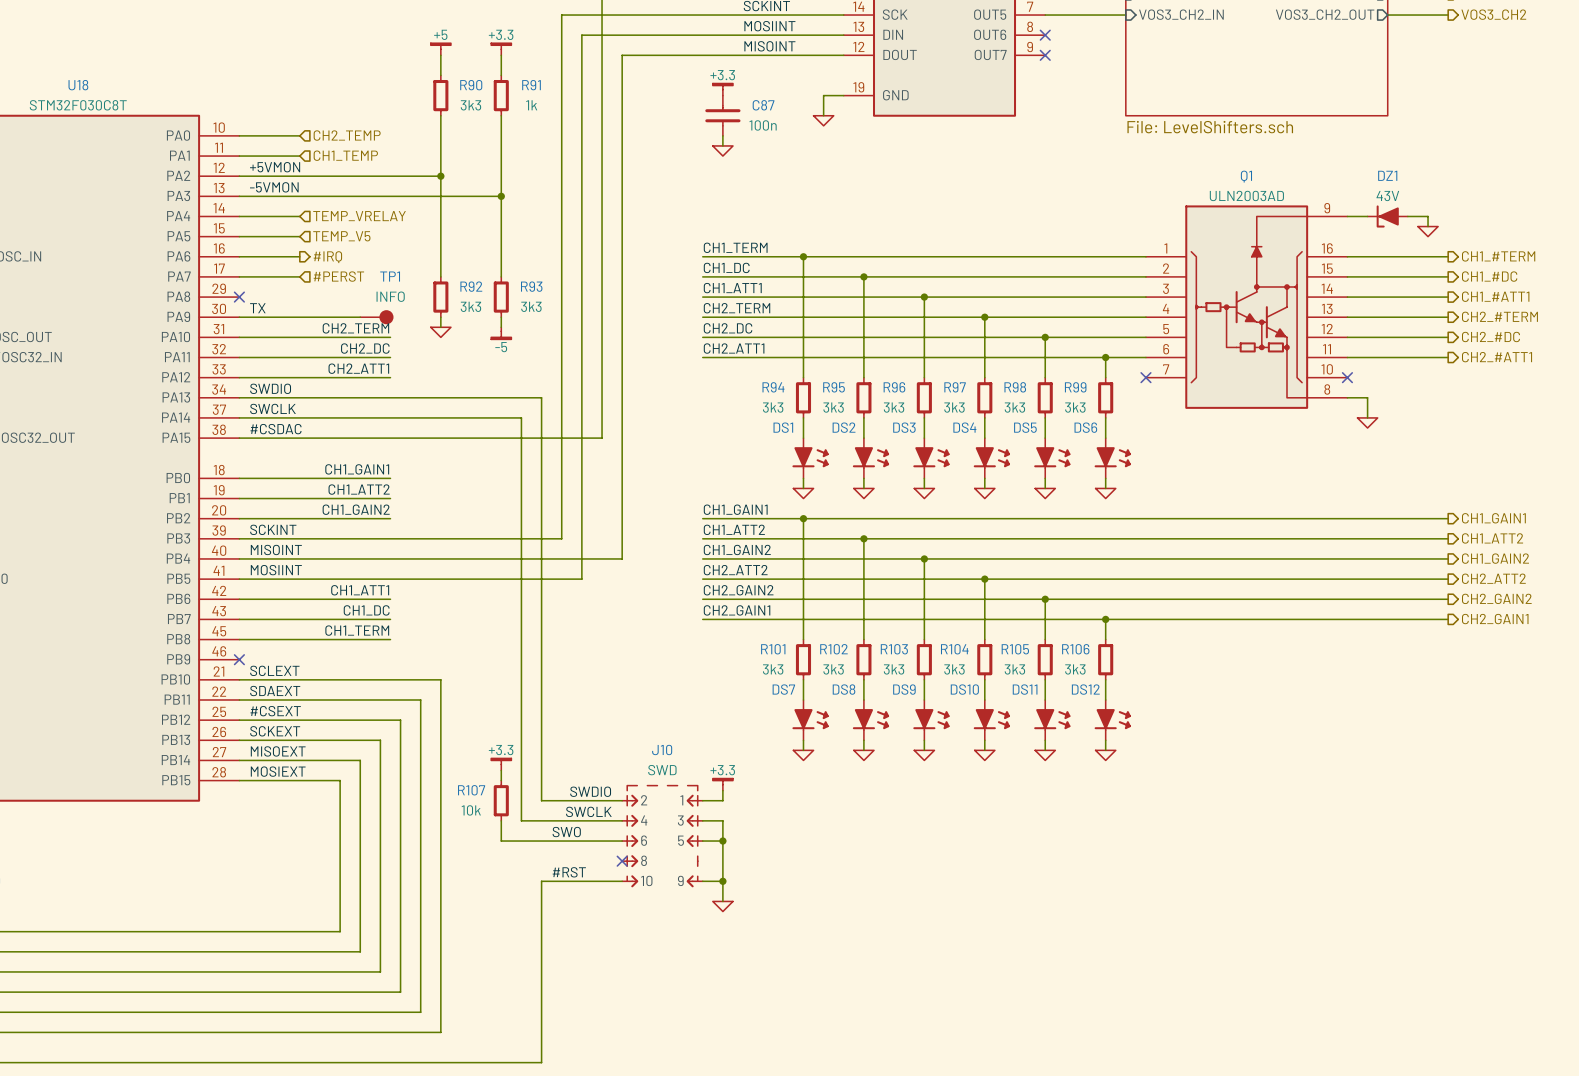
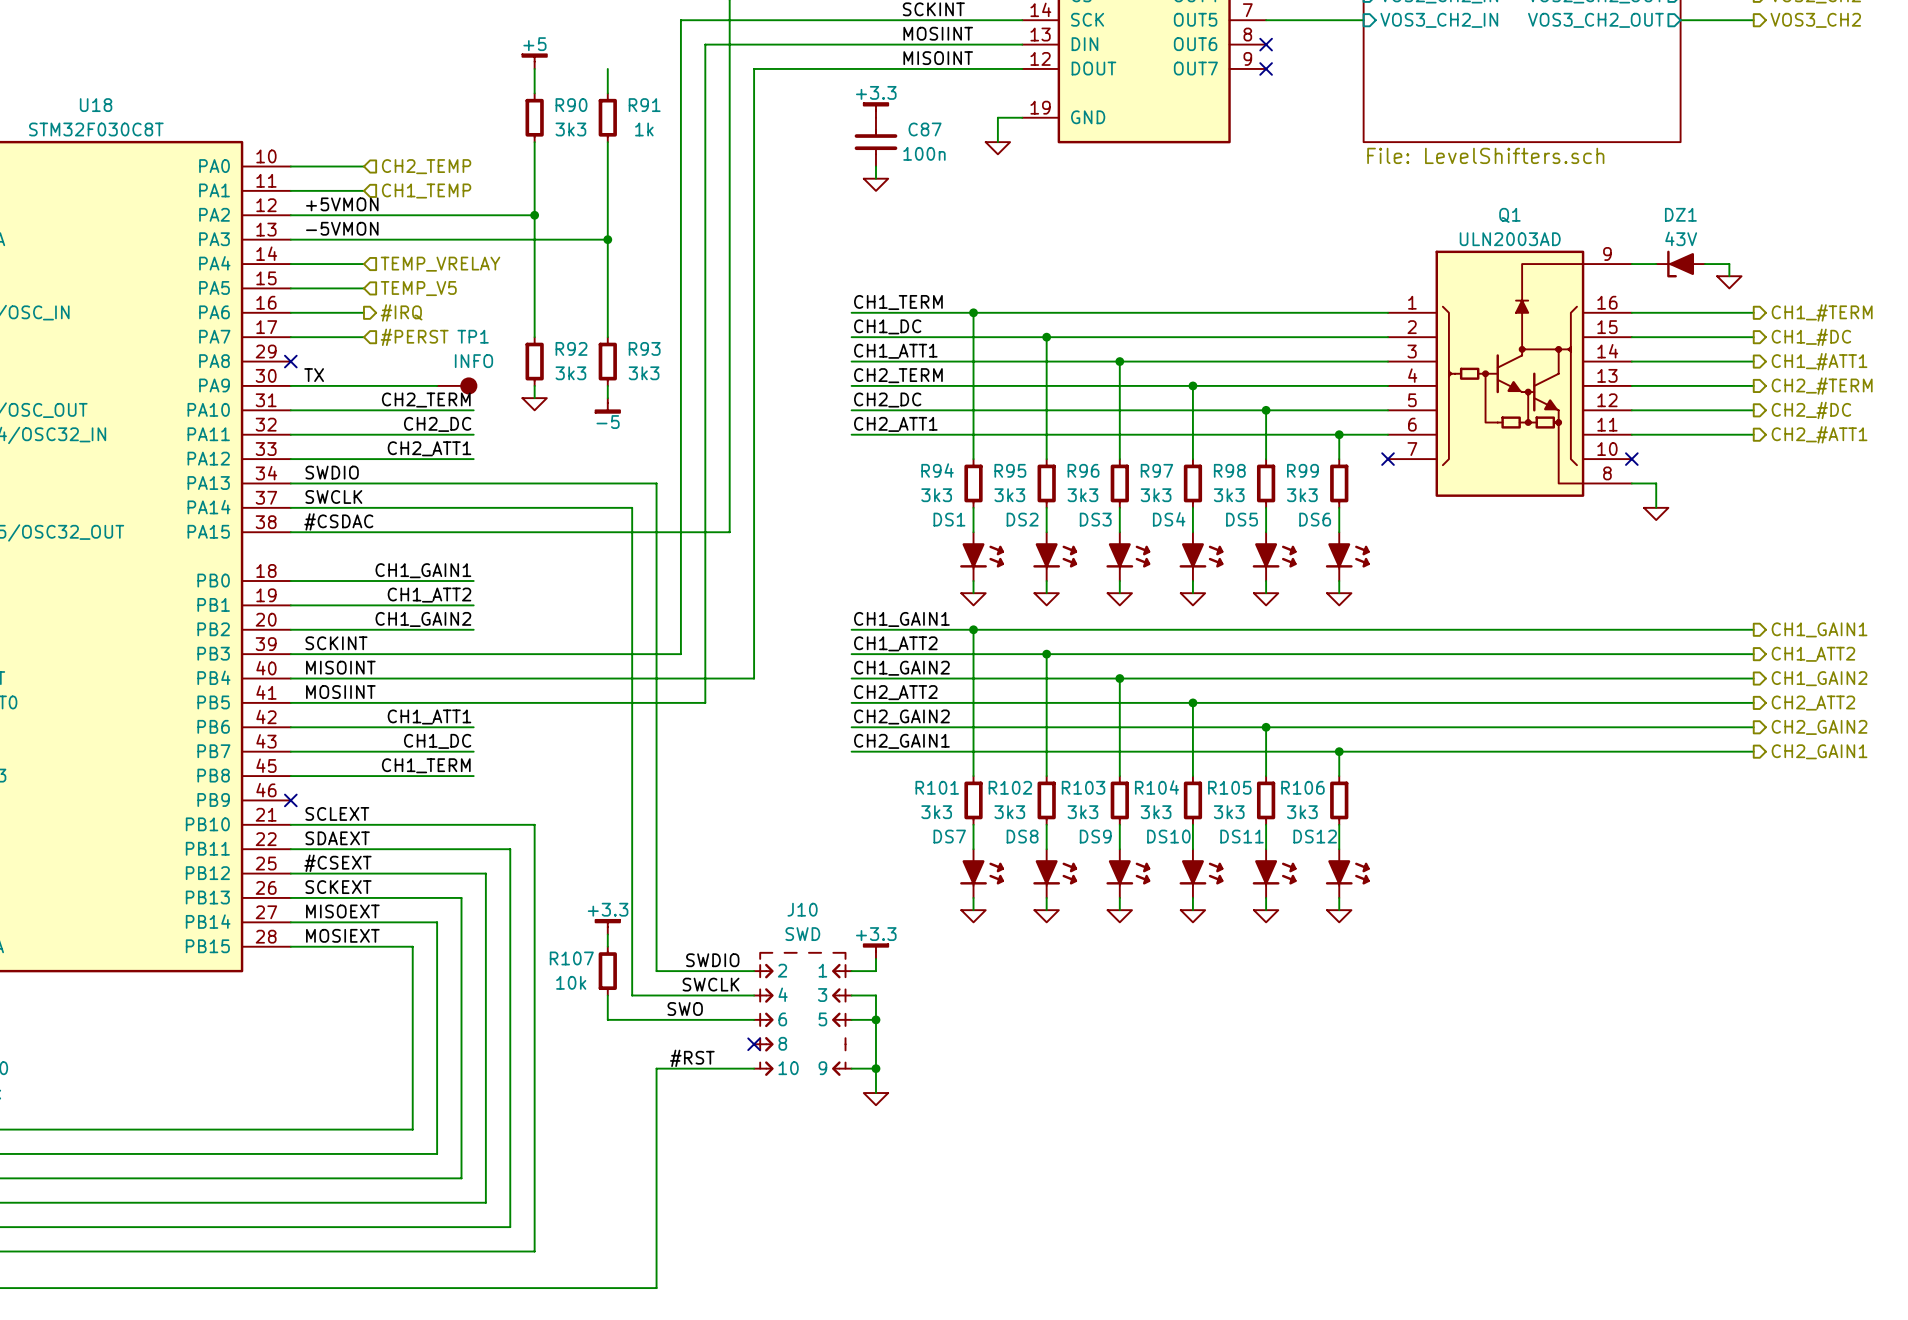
power symbol: +3.3 (501, 49) -> none

